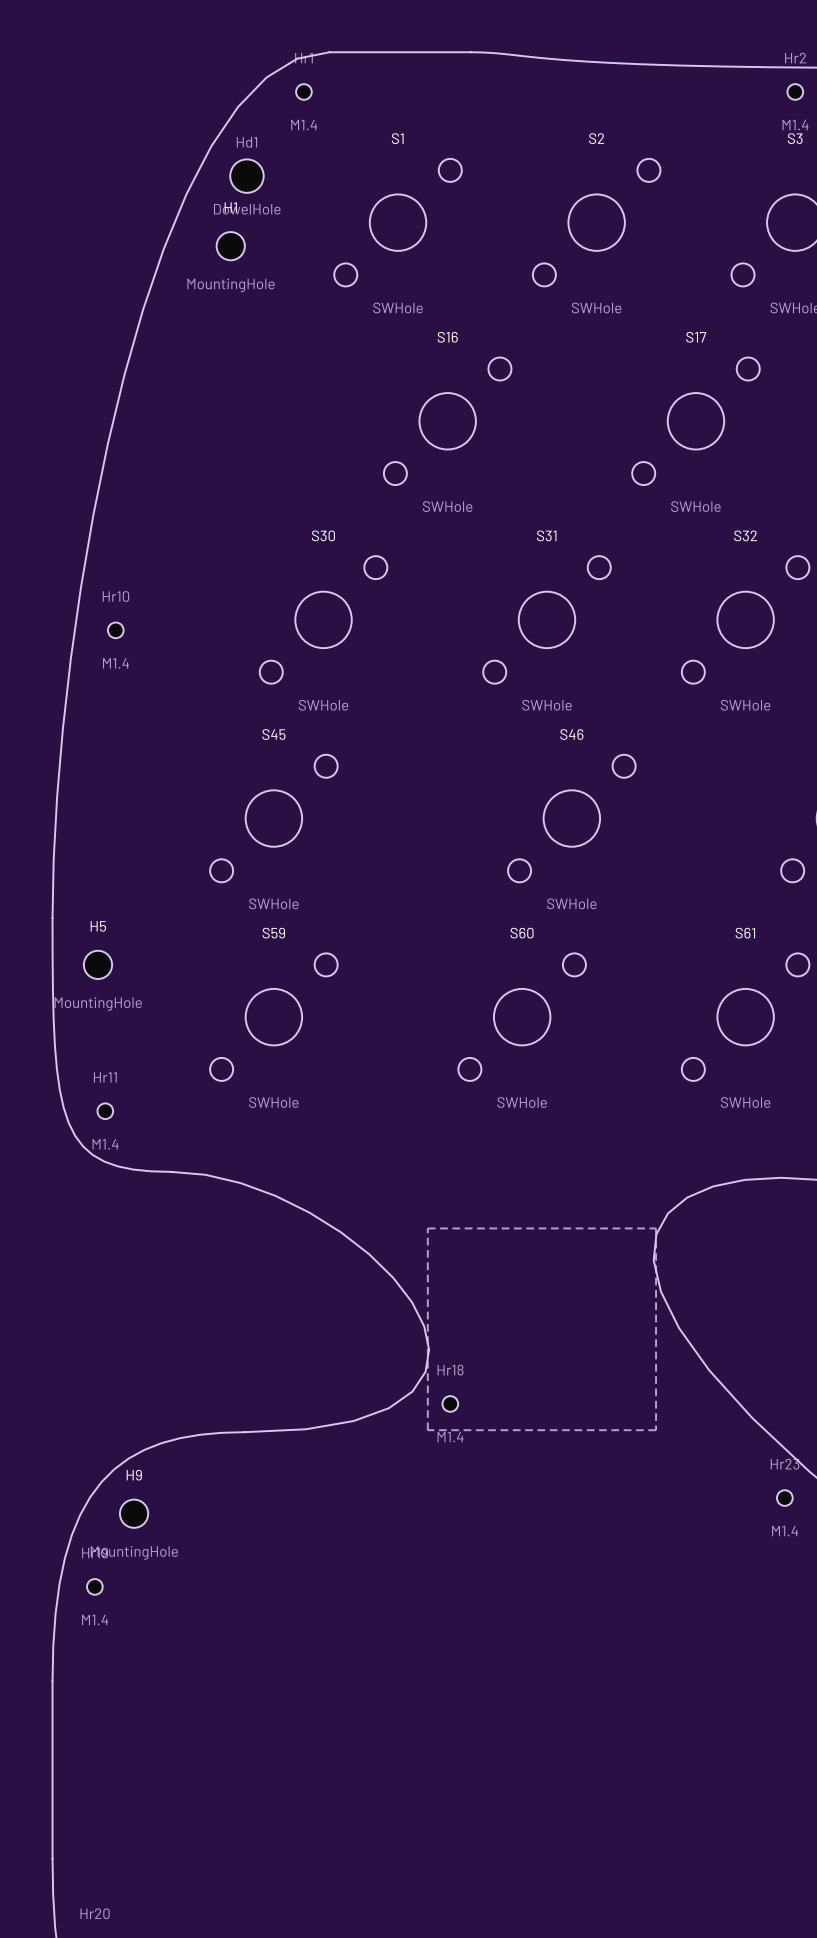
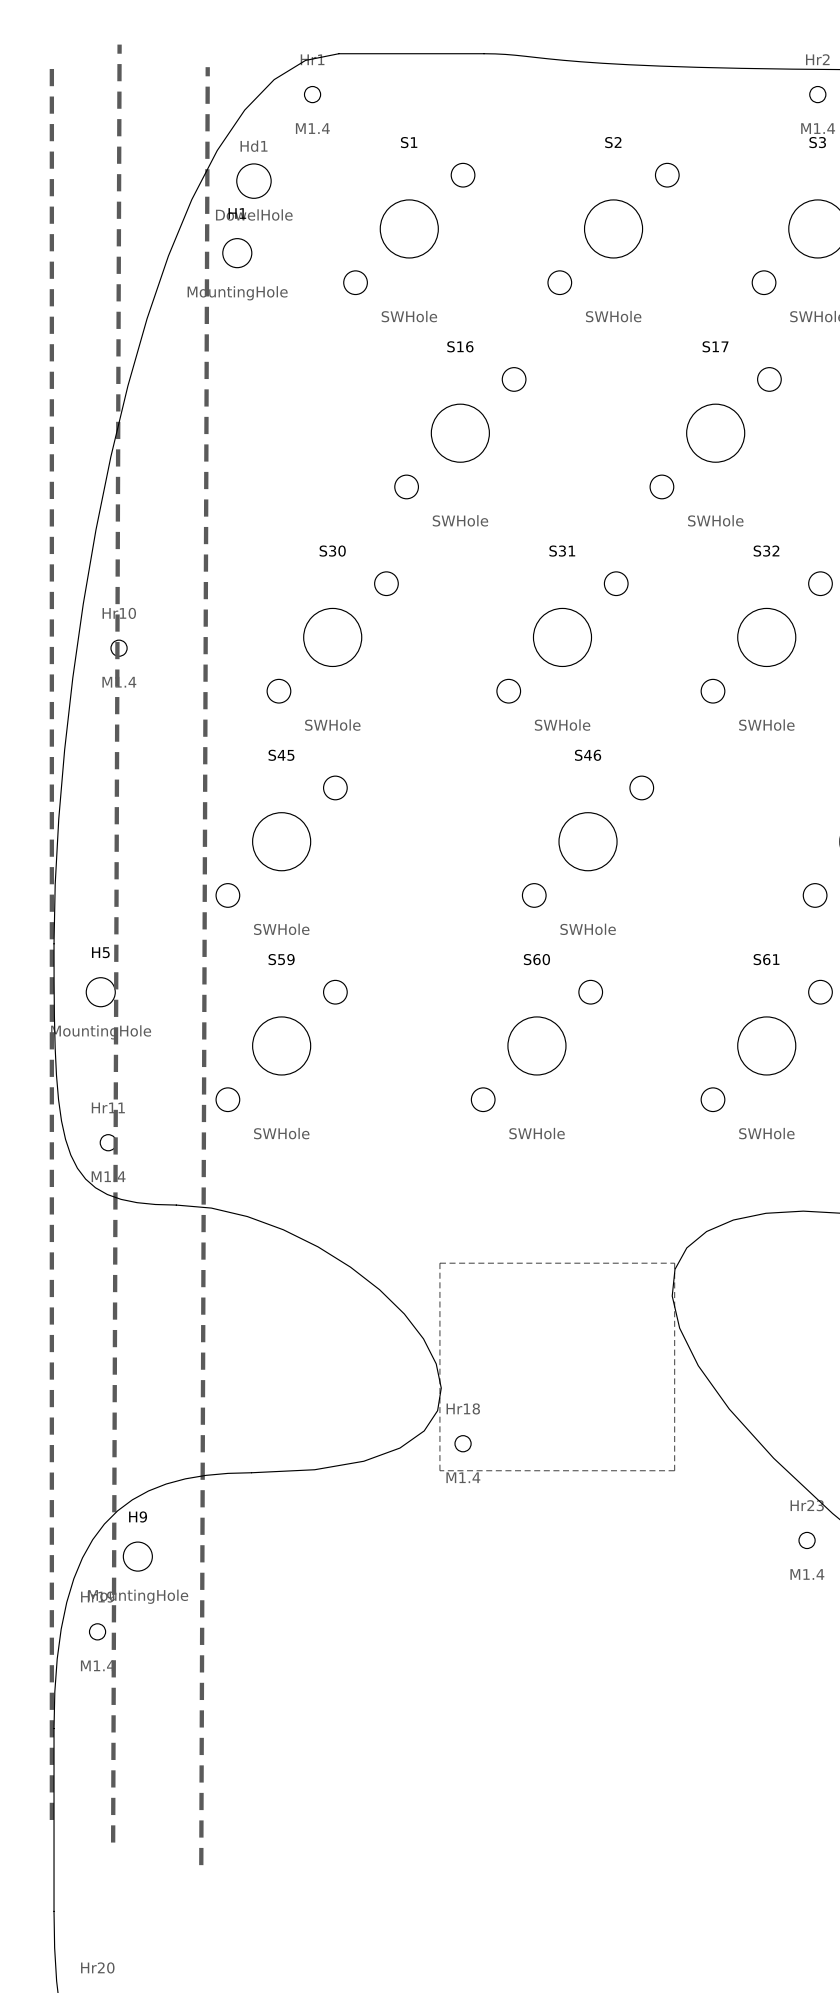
line: none -> (119, 44) (113, 1842)
line: none -> (51, 67) (51, 1819)
line: none -> (207, 67) (201, 1865)

